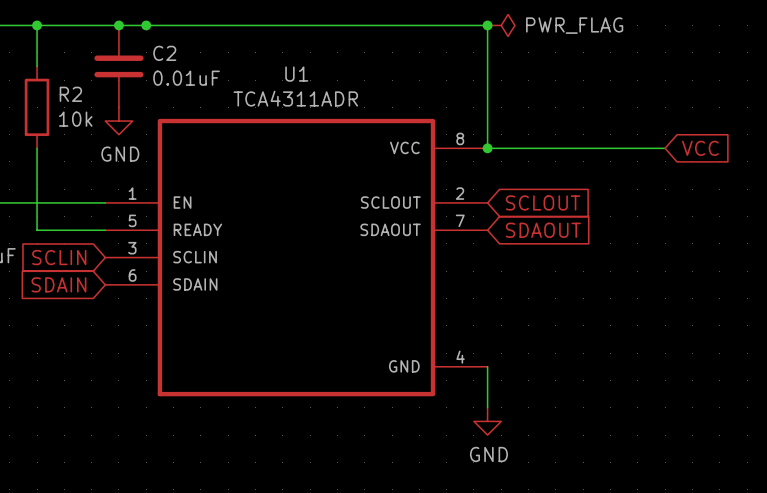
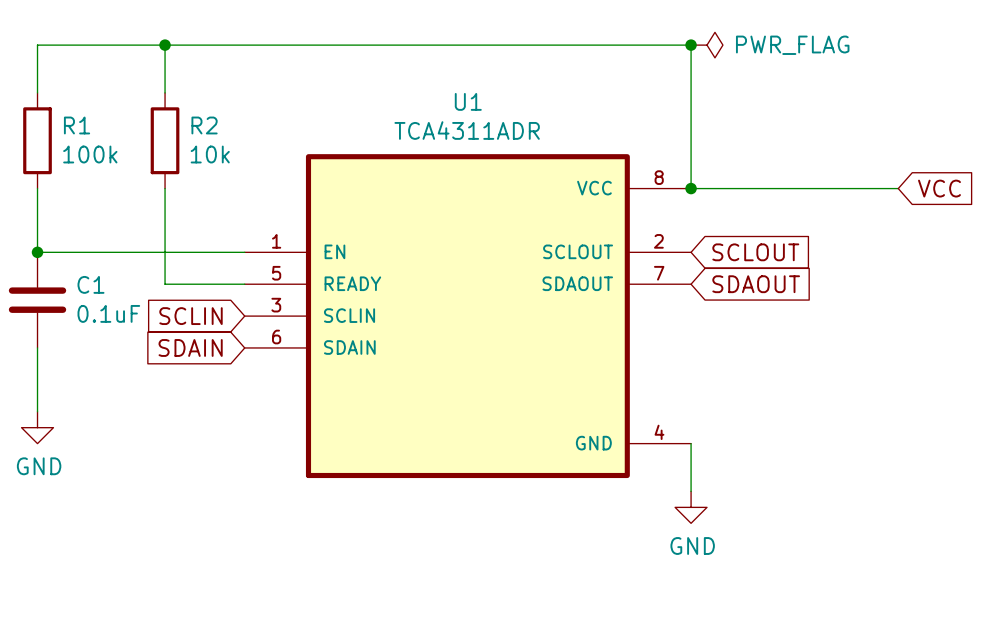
junction: (118, 25) -> none
junction: (146, 25) -> none
C2: 0.01uF (118, 66) -> none
power symbol: GND (118, 121) -> none

